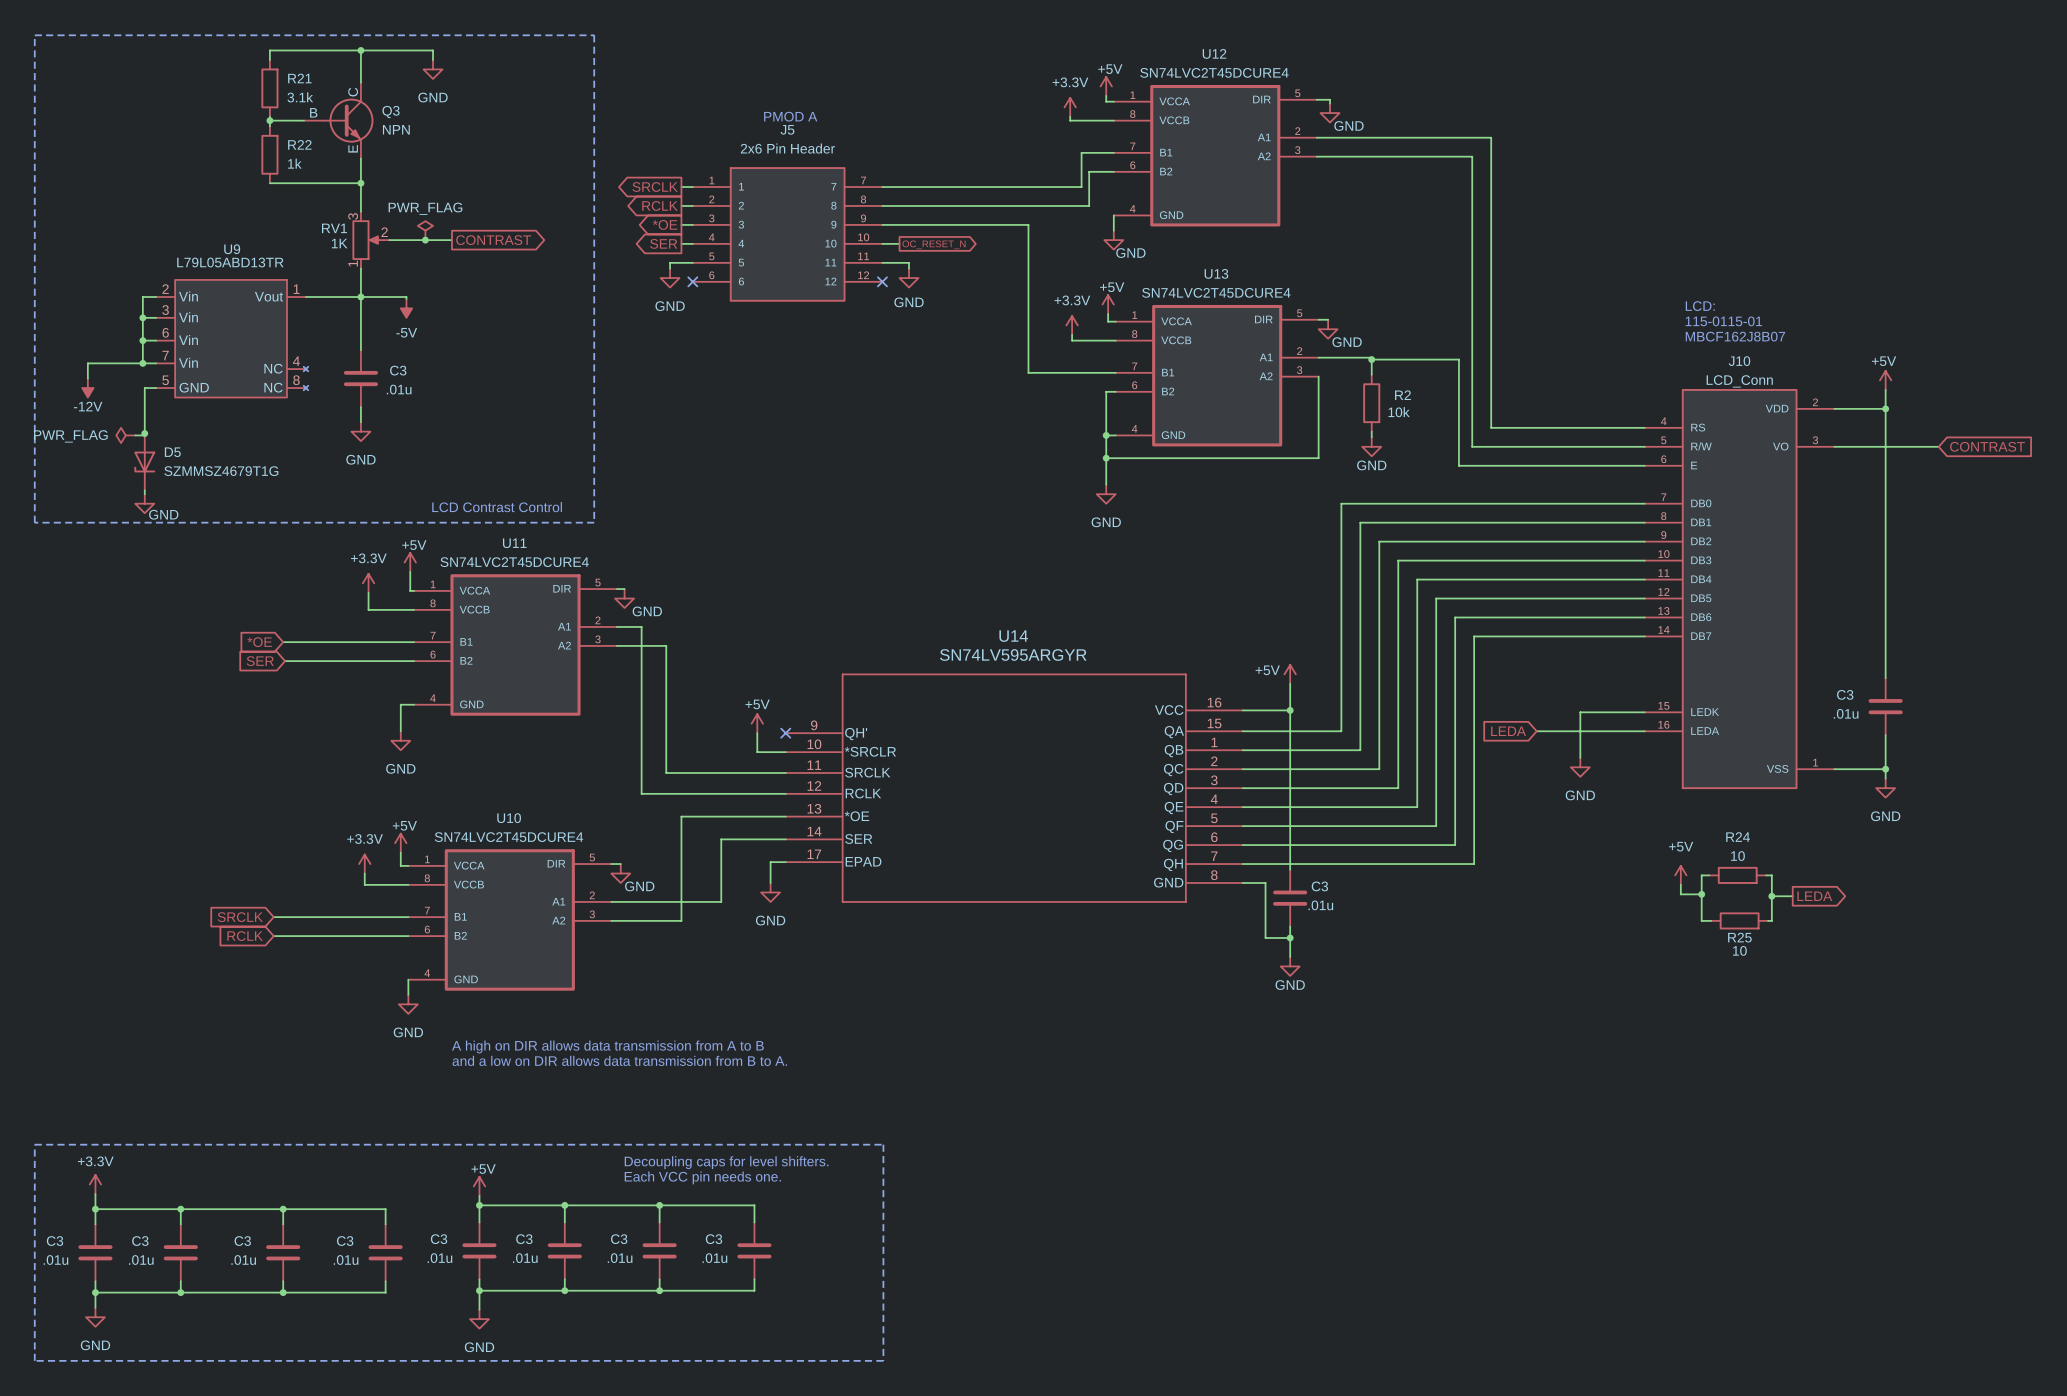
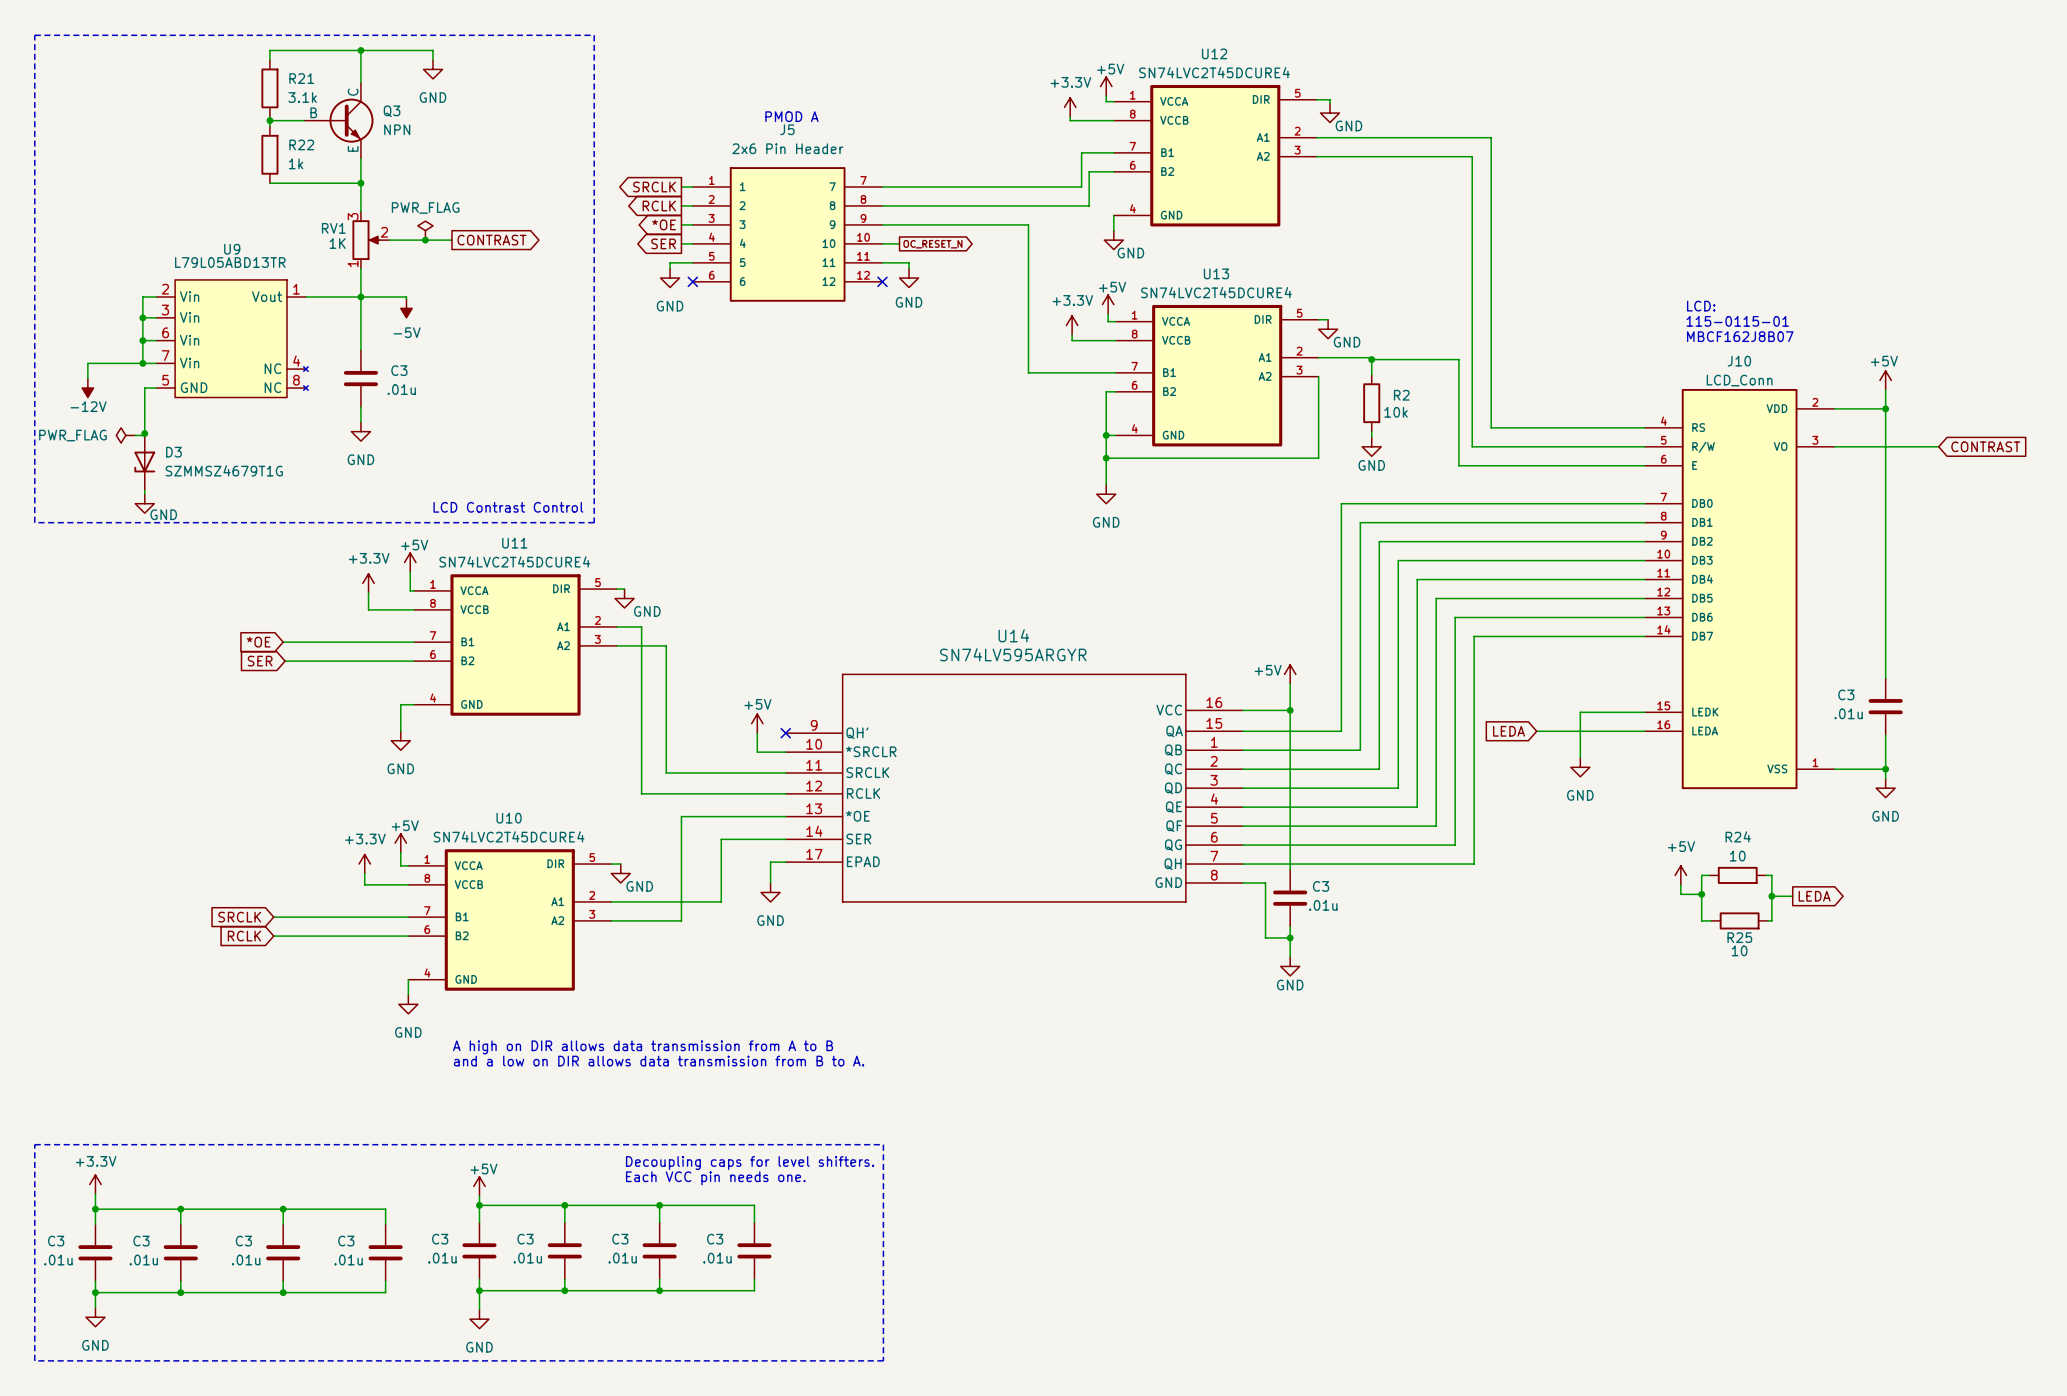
D5 name: D5 (172, 452) -> D3 (173, 452)

